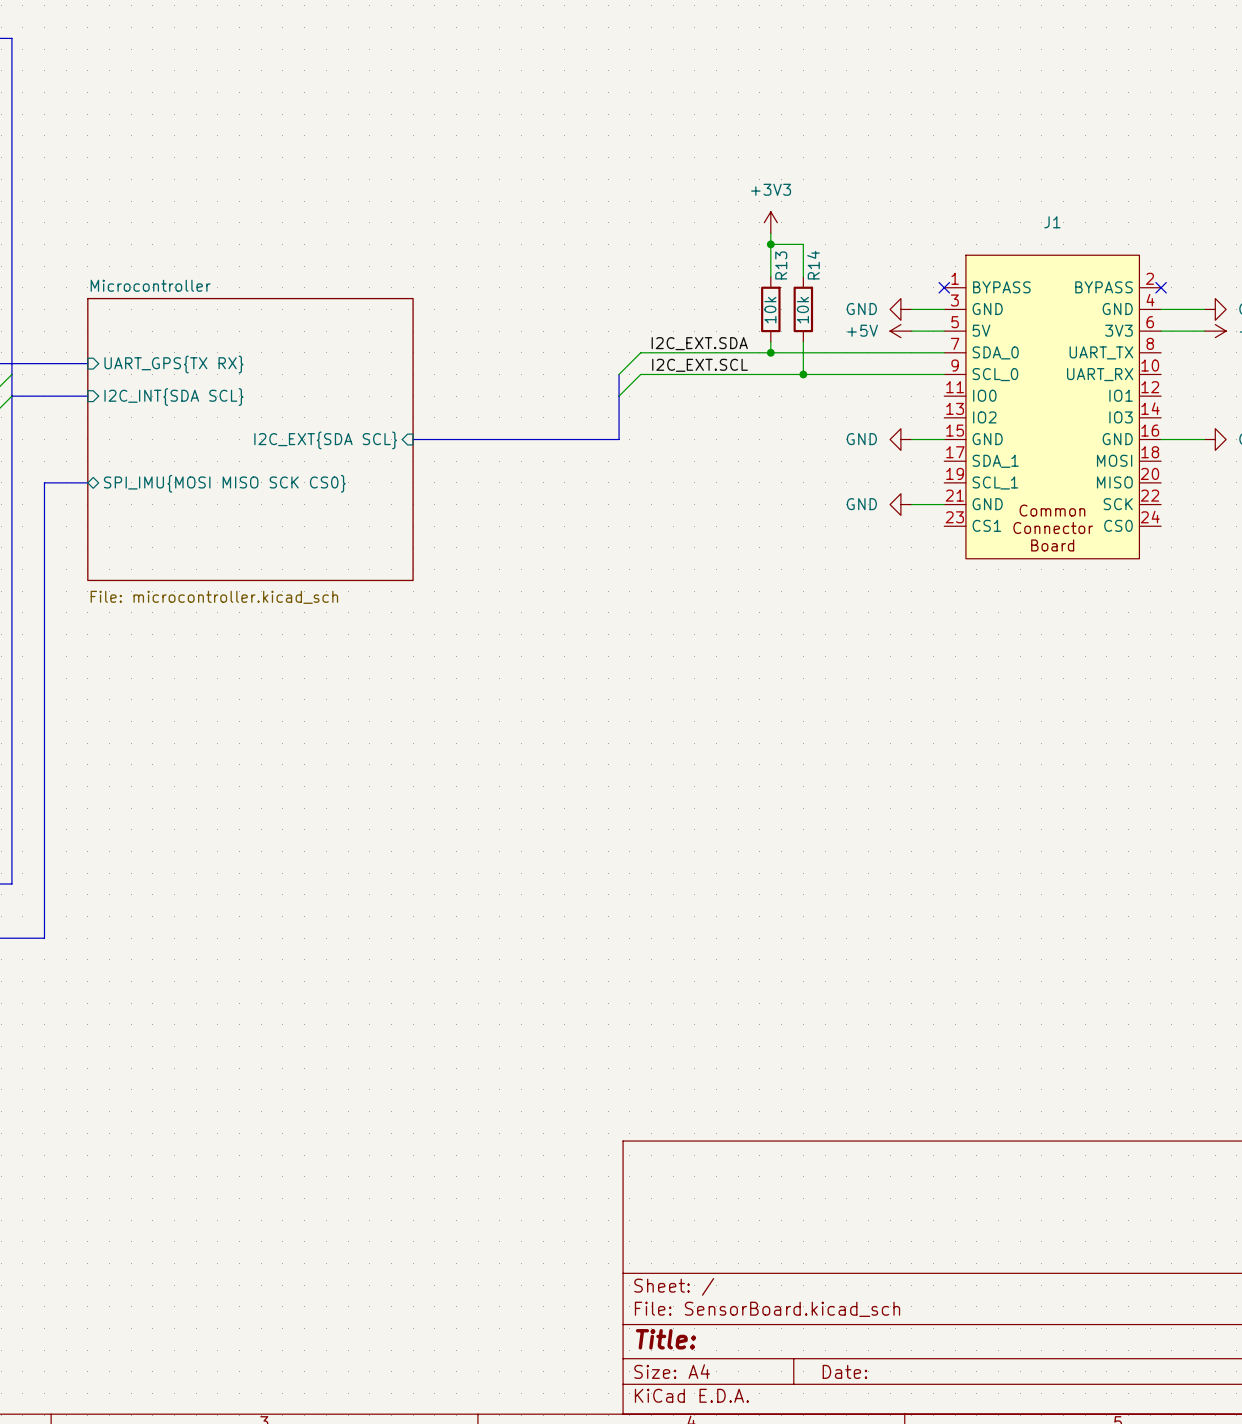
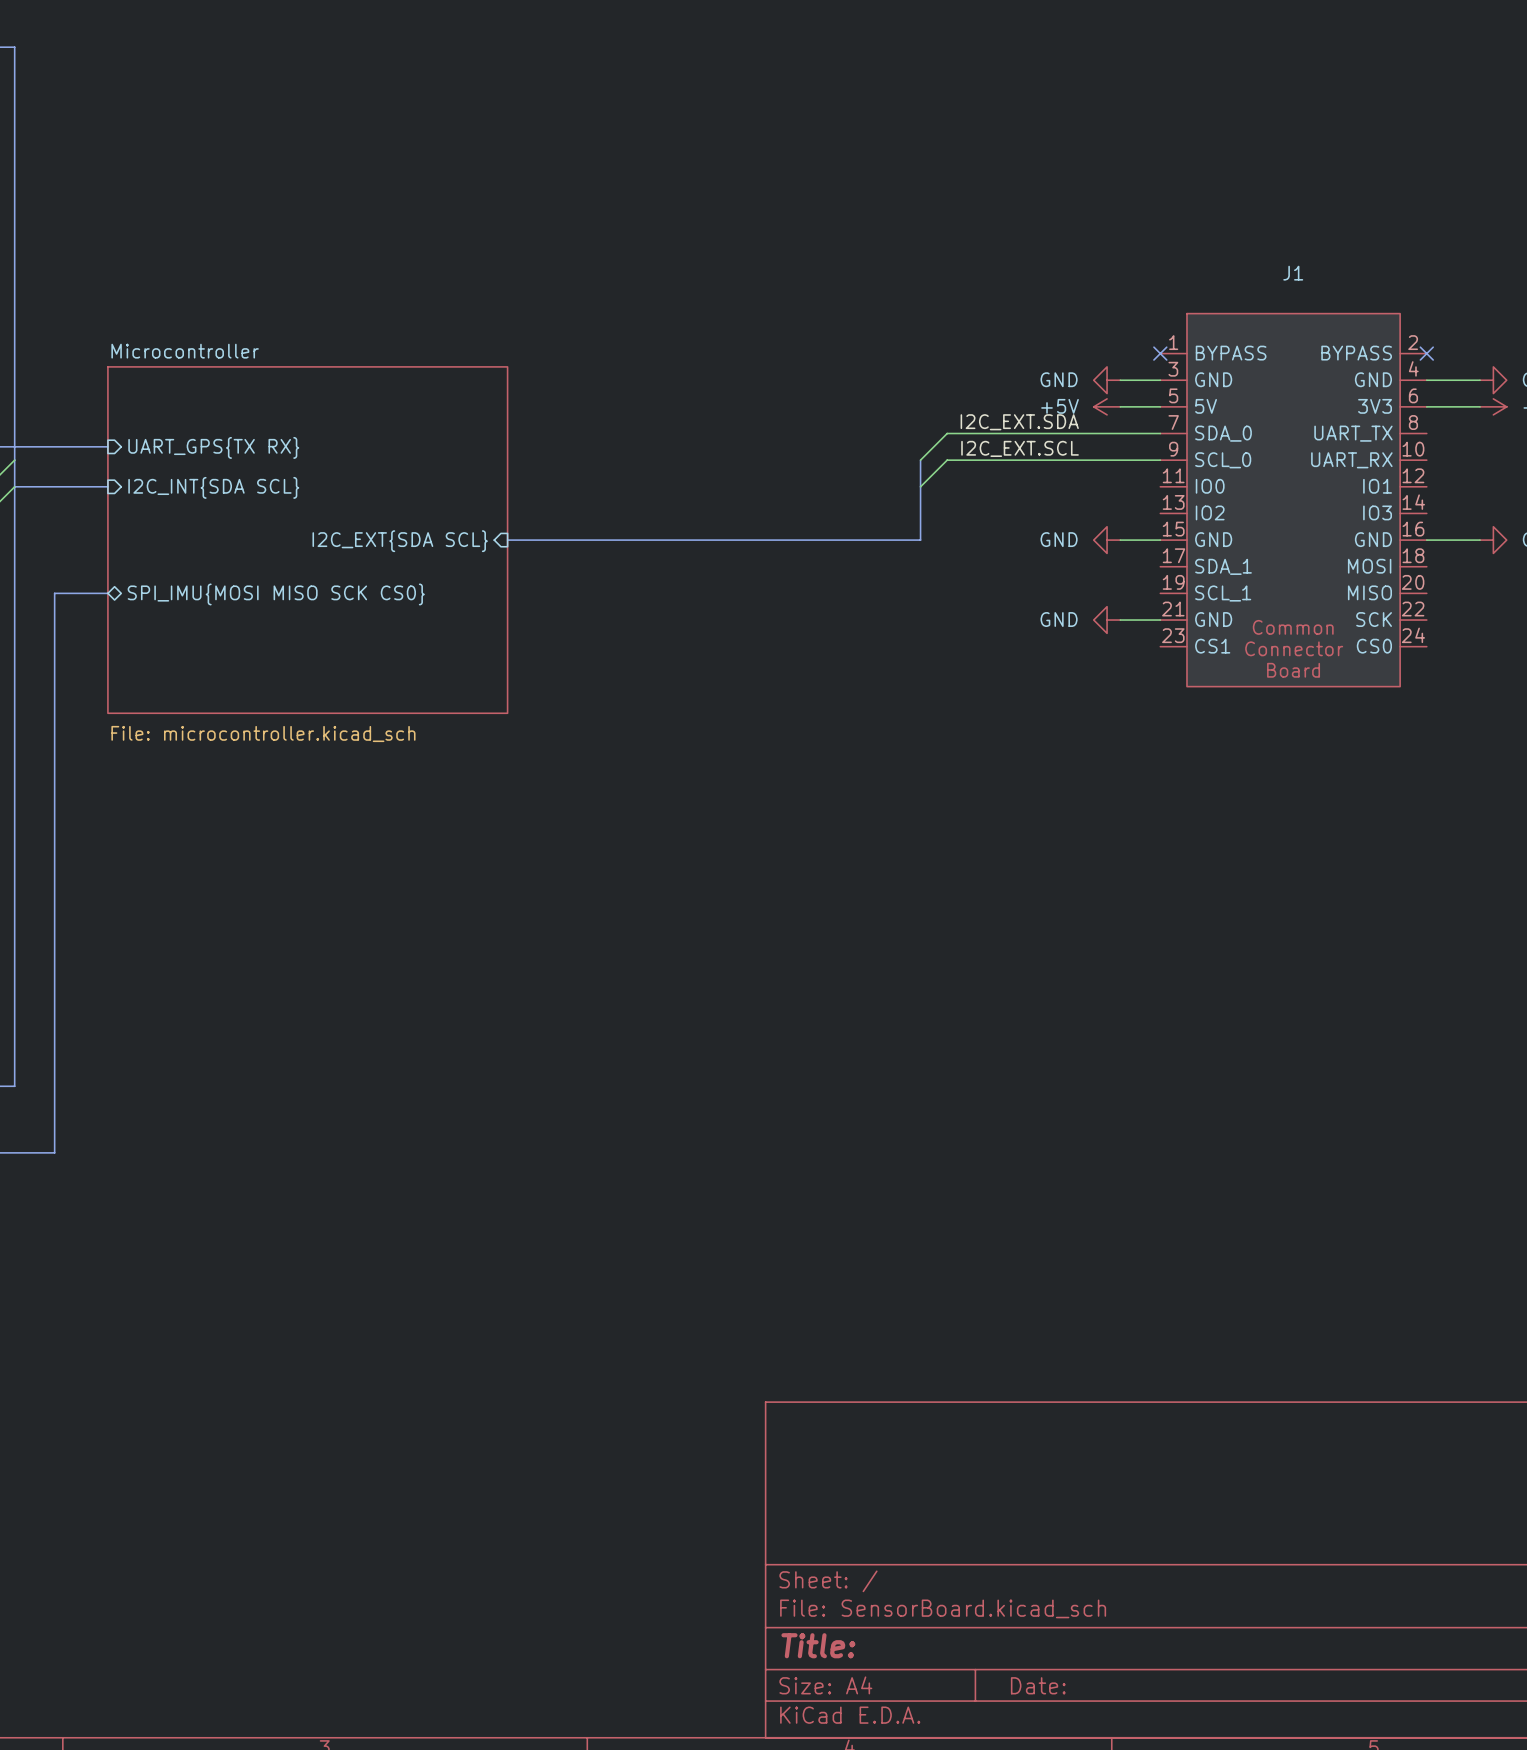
power symbol: +3V3 (770, 222) -> none
wire: (770, 233) (770, 276) -> none
wire: (770, 244) (803, 244) (803, 276) -> none
junction: (770, 244) -> none
R13: 10k (770, 309) -> none
R14: 10k (803, 309) -> none
wire: (770, 341) (770, 352) (640, 352) (619, 374) -> none
wire: (803, 341) (803, 374) -> none
label position: I2C_EXT.SDA (699, 343) -> I2C_EXT.SDA (1019, 422)
wire: none -> (947, 433) (920, 460)
junction: (770, 352) -> none
label position: I2C_EXT.SCL (700, 365) -> I2C_EXT.SCL (1020, 448)
bus: (619, 374) (619, 439) -> (920, 460) (920, 540) (760, 540)
wire: (770, 374) (640, 374) (619, 396) -> (947, 460) (920, 486)
junction: (803, 374) -> none

